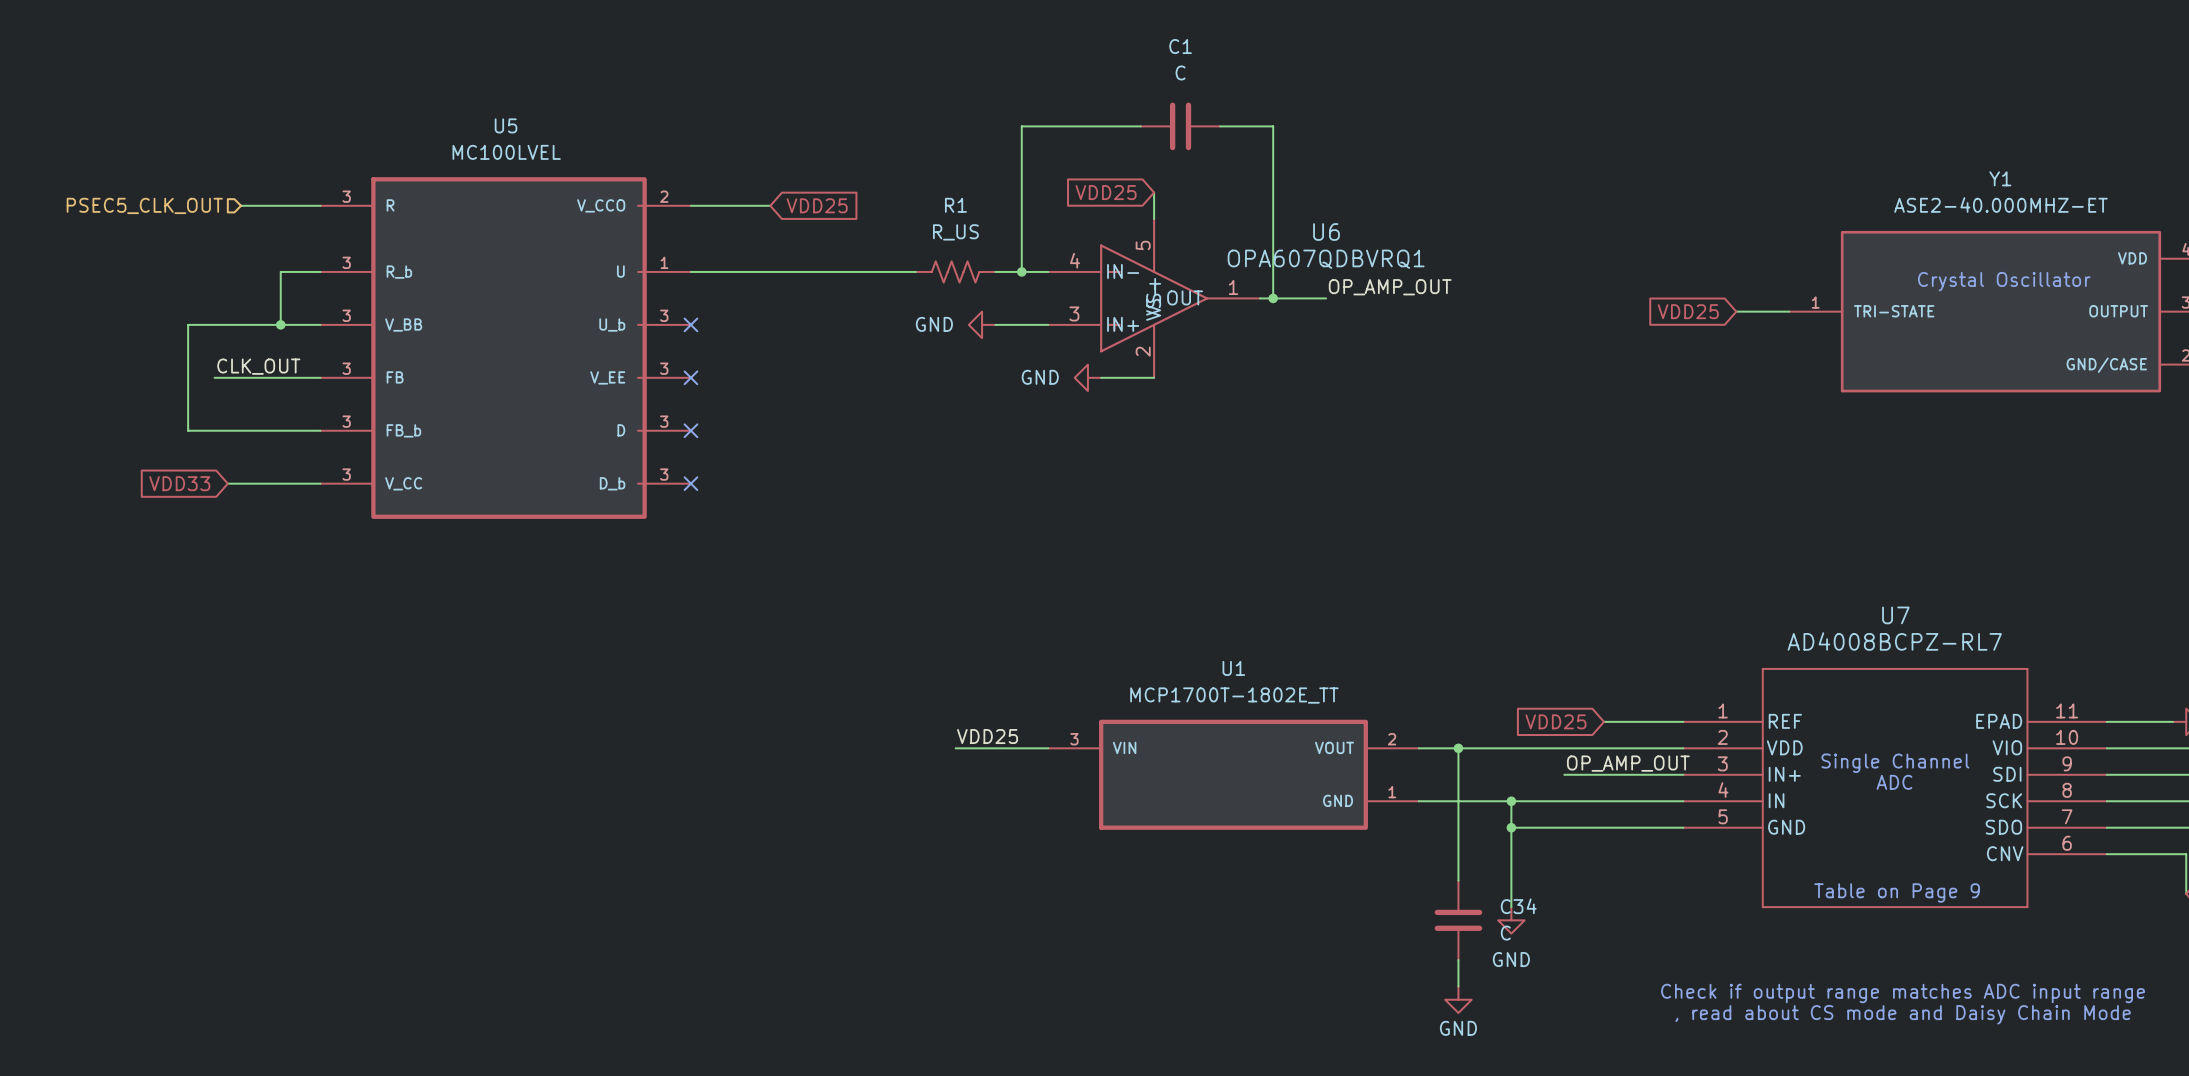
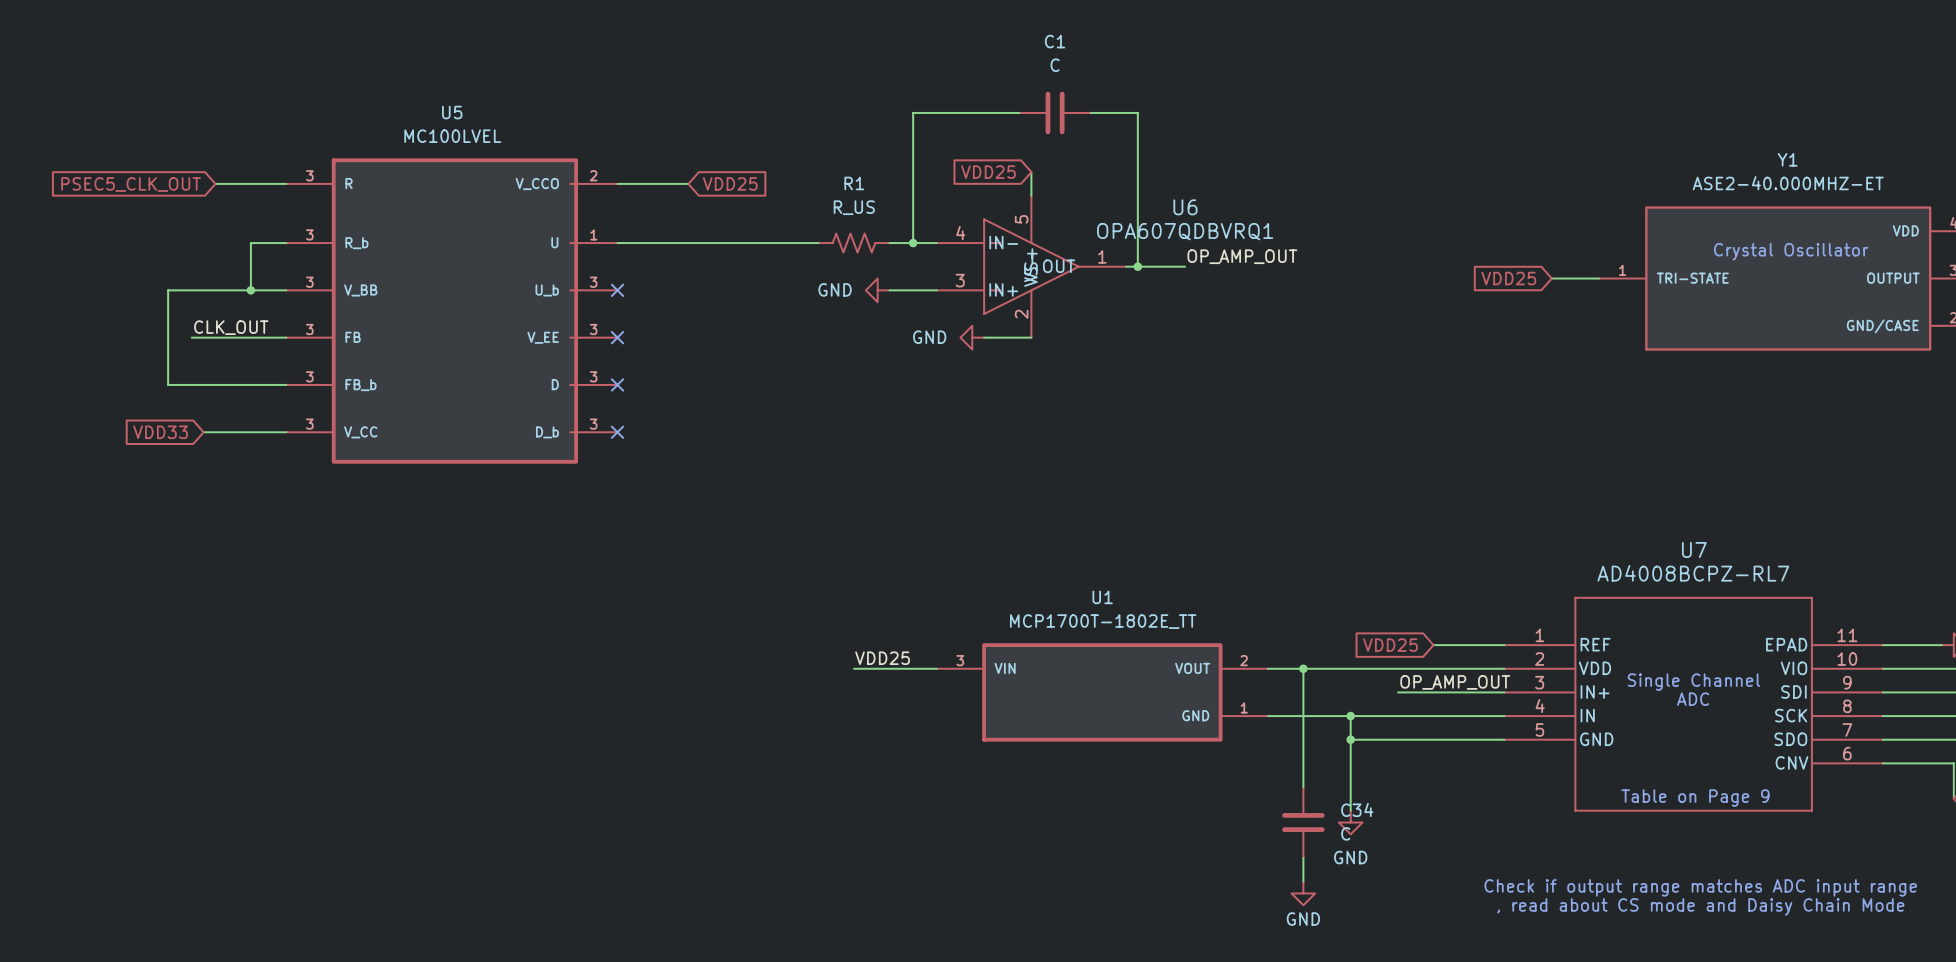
hierarchical label: PSEC5_CLK_OUT (144, 205) -> none
global label: none -> PSEC5_CLK_OUT (131, 184)

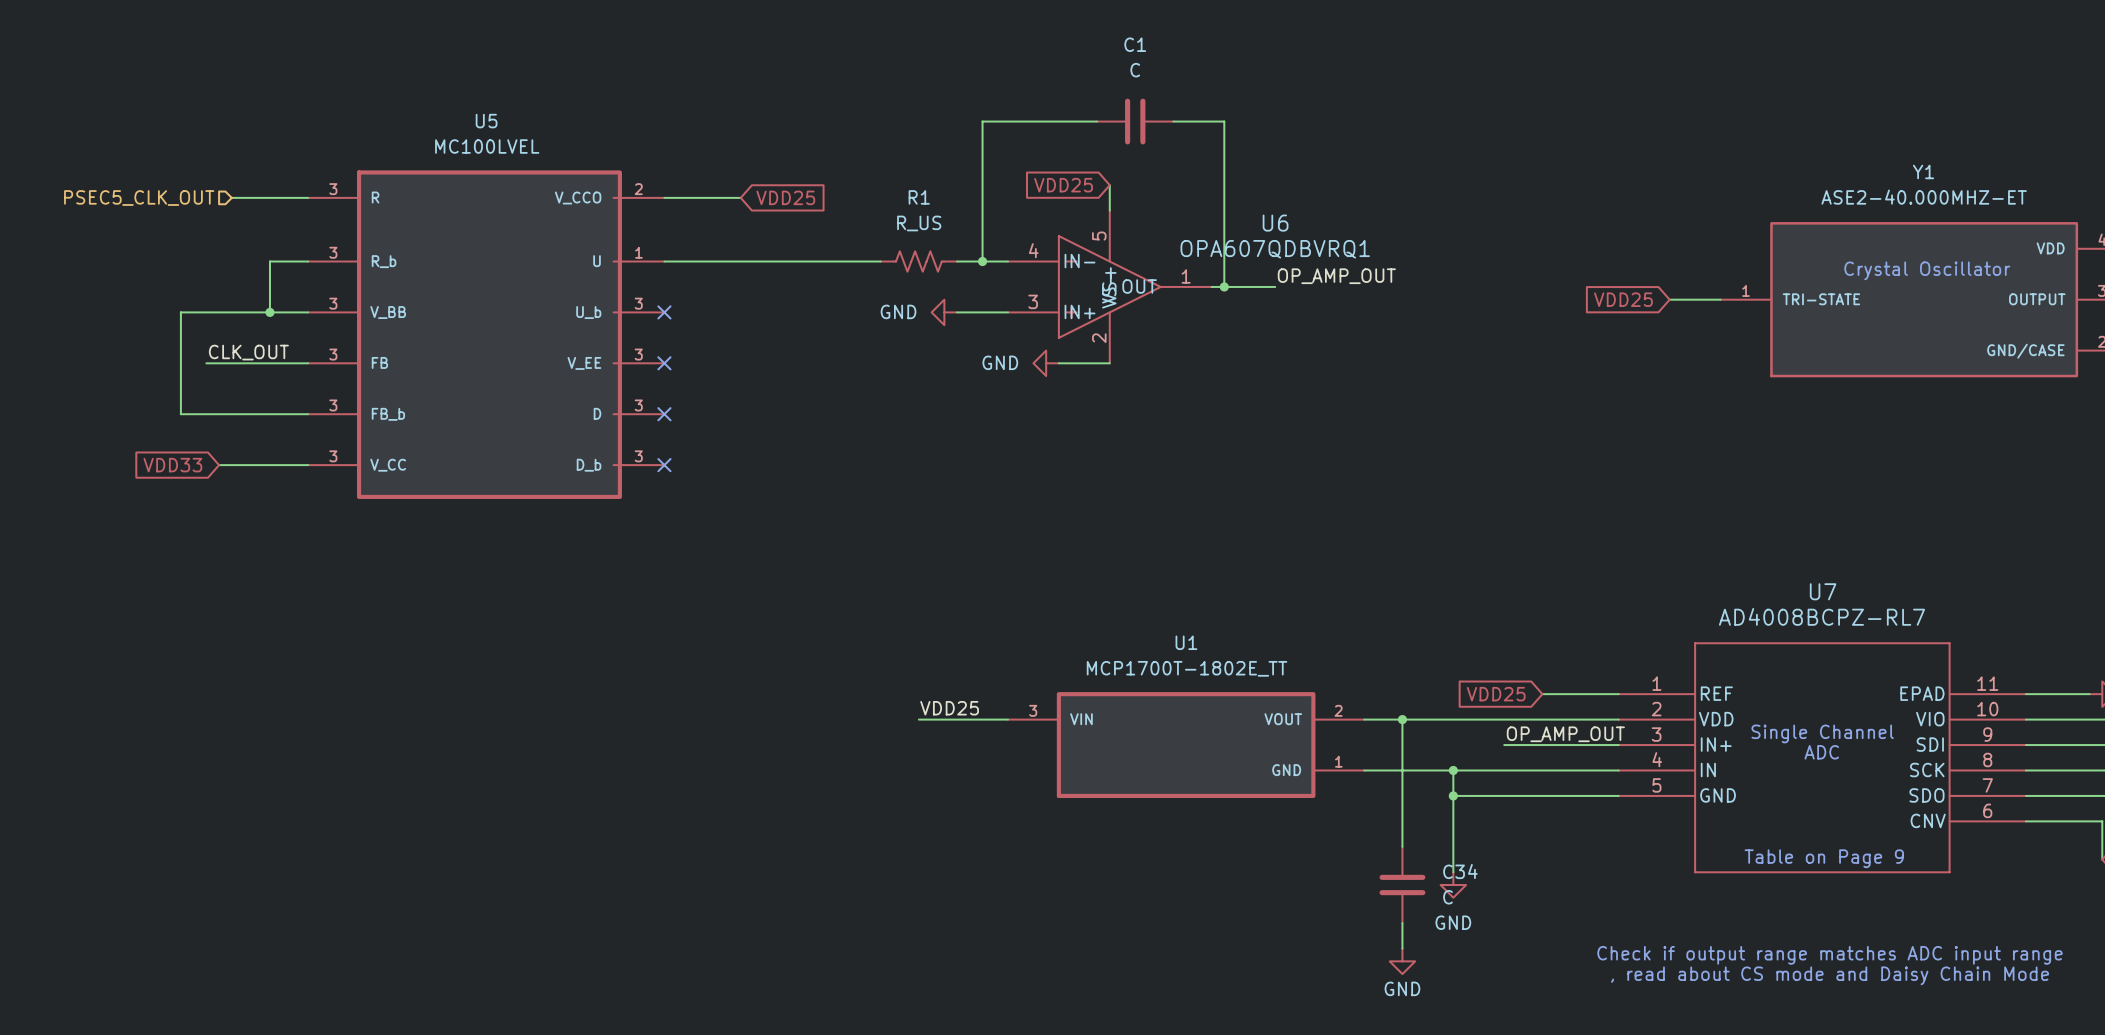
hierarchical label: none -> PSEC5_CLK_OUT (139, 198)
global label: PSEC5_CLK_OUT (131, 184) -> none

